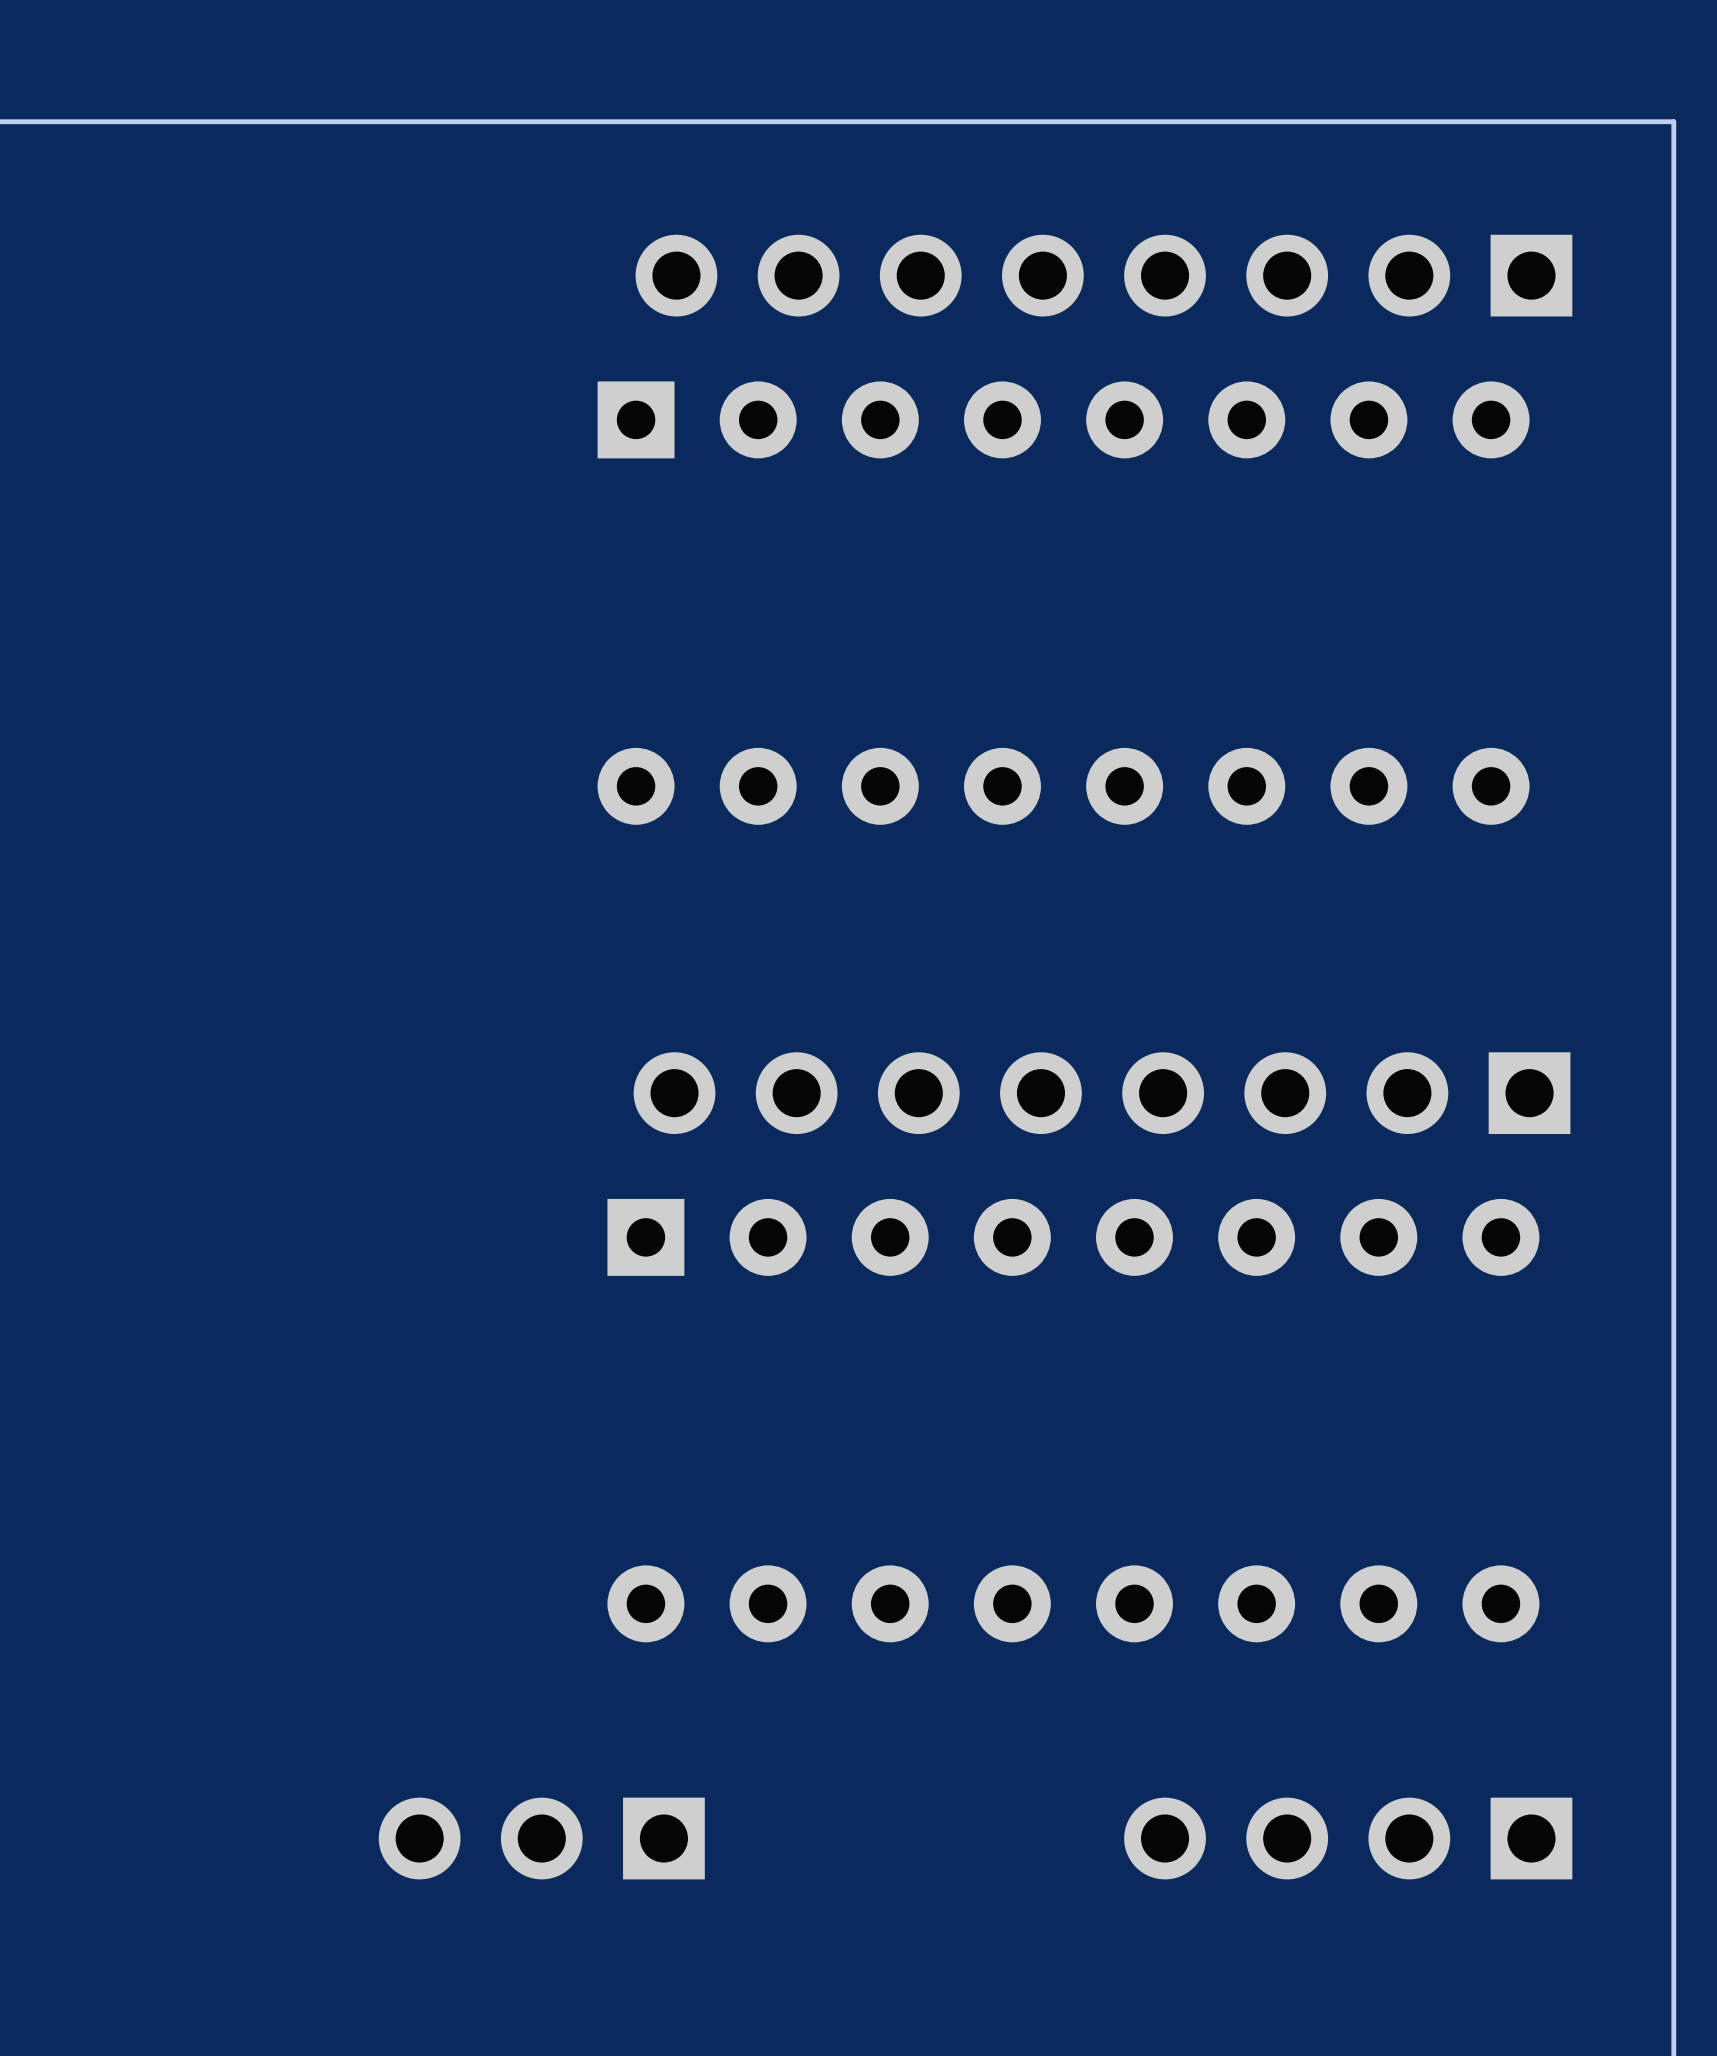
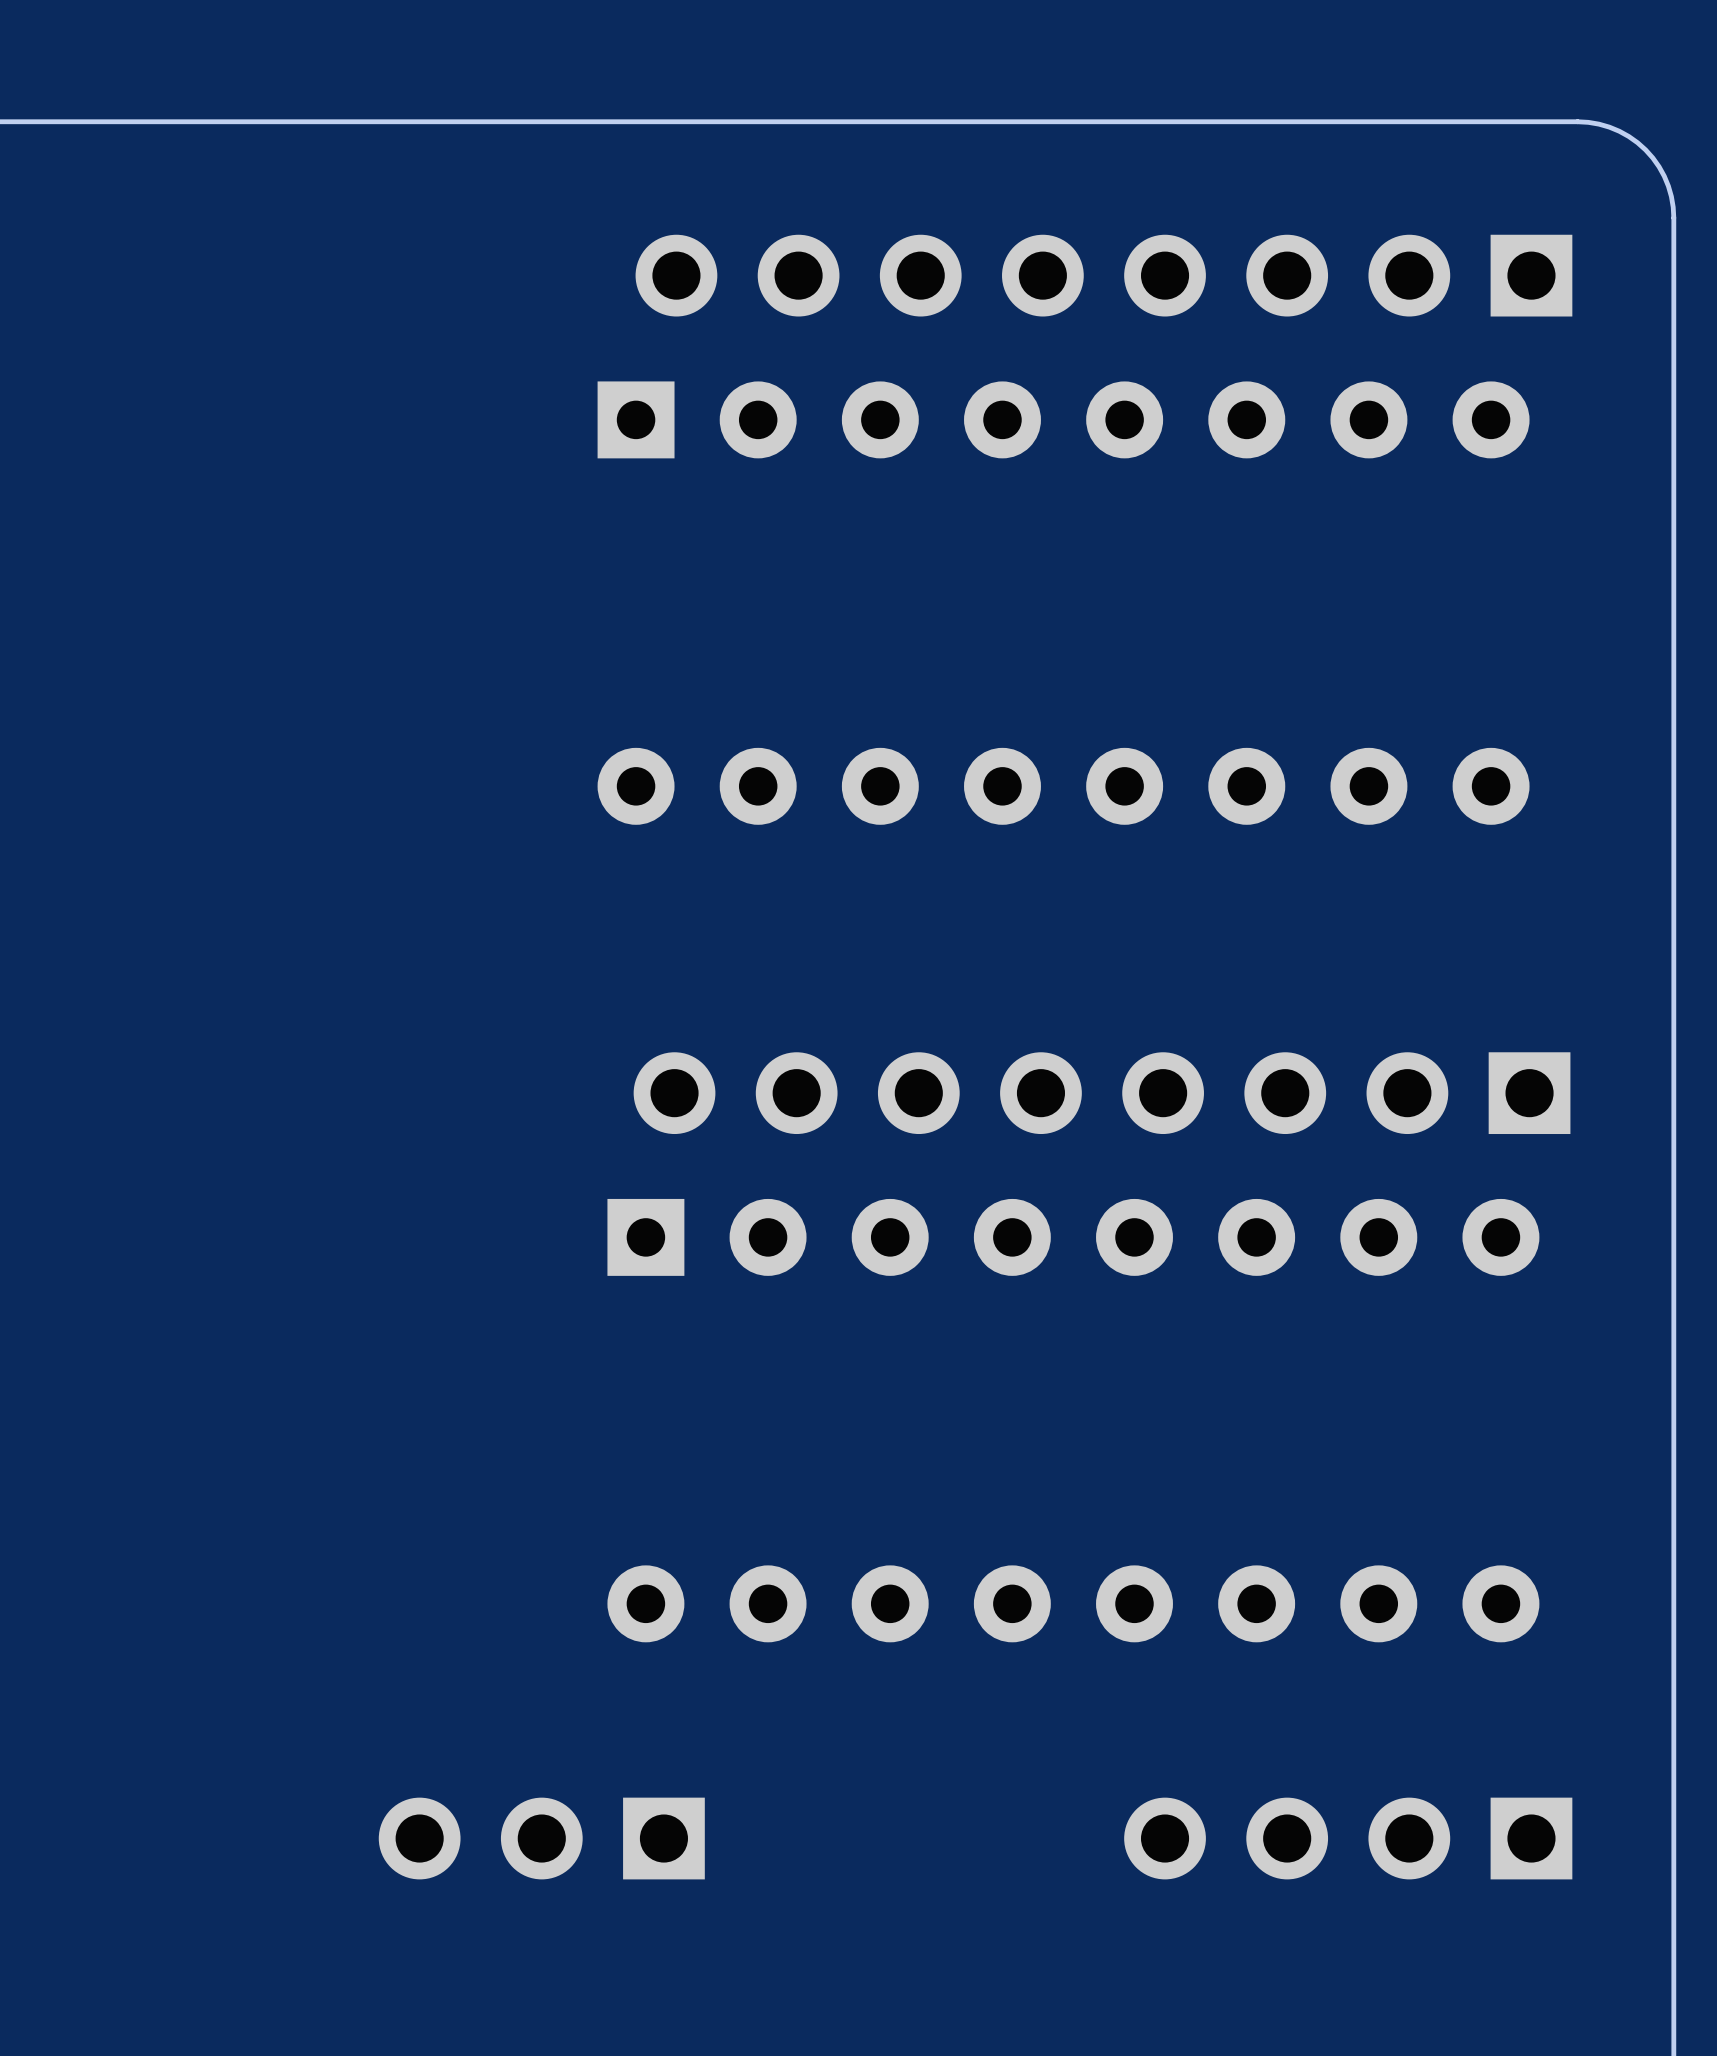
board edge: (1577, 121) (1673, 121) (1673, 217) -> (1577, 121) (1609, 127) (1628, 136) (1645, 149) (1664, 176) (1671, 196) (1673, 217)

